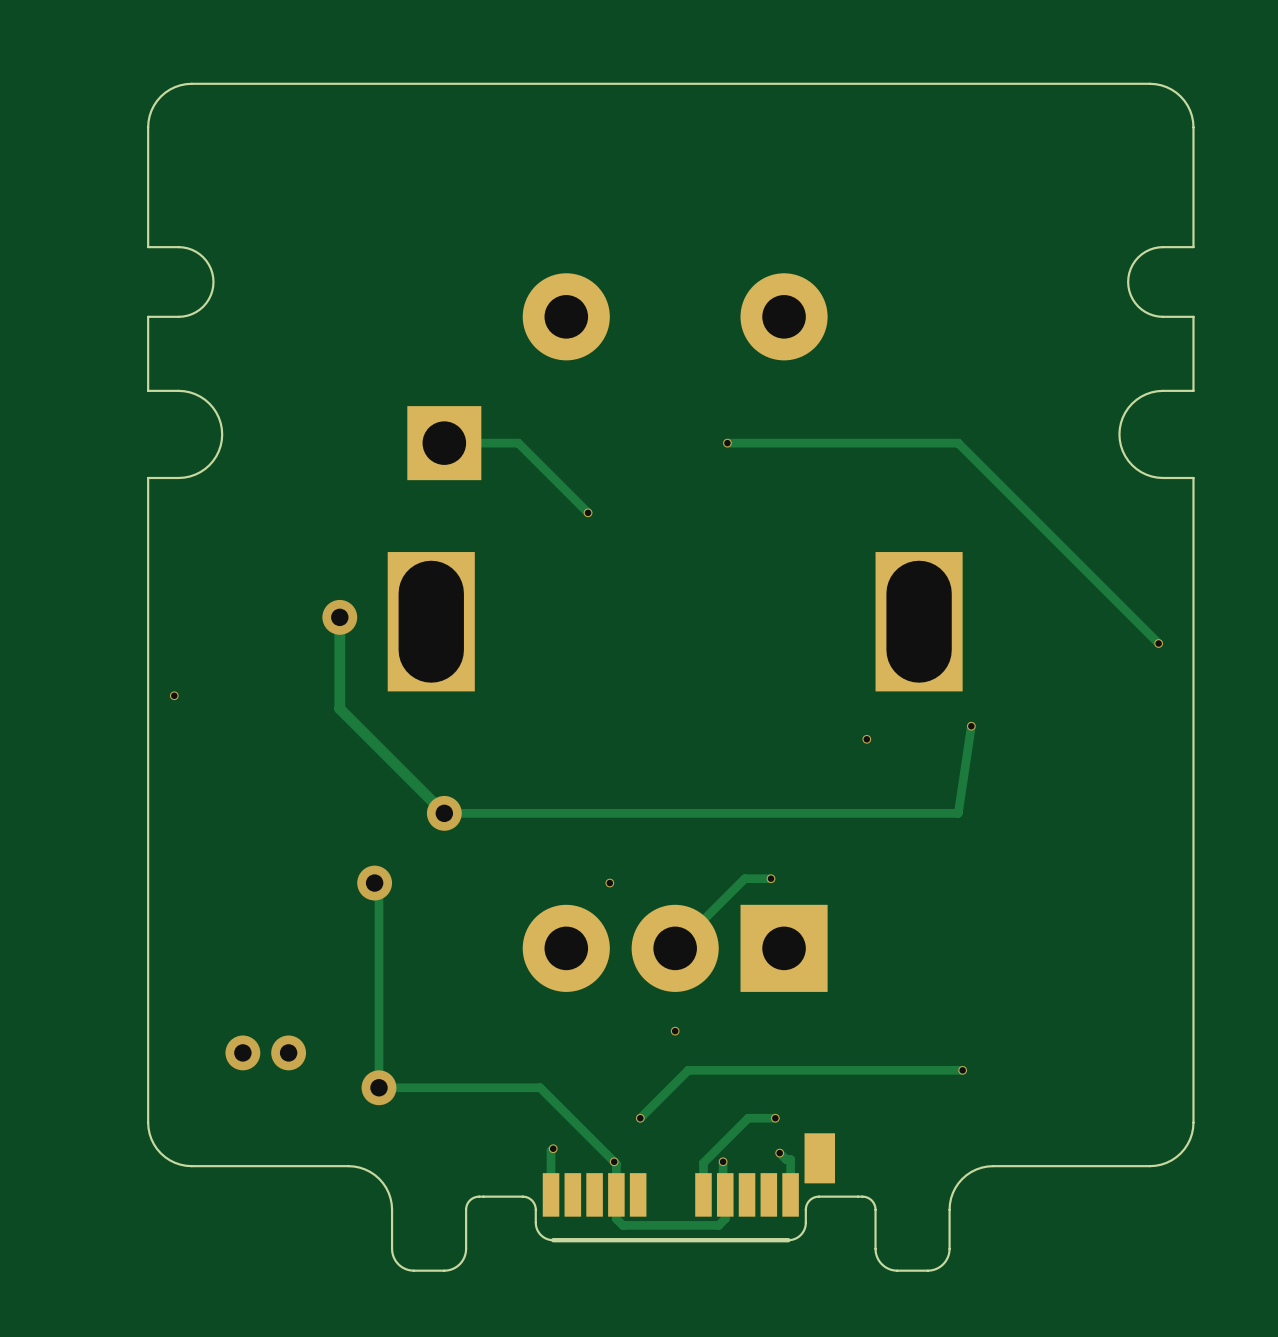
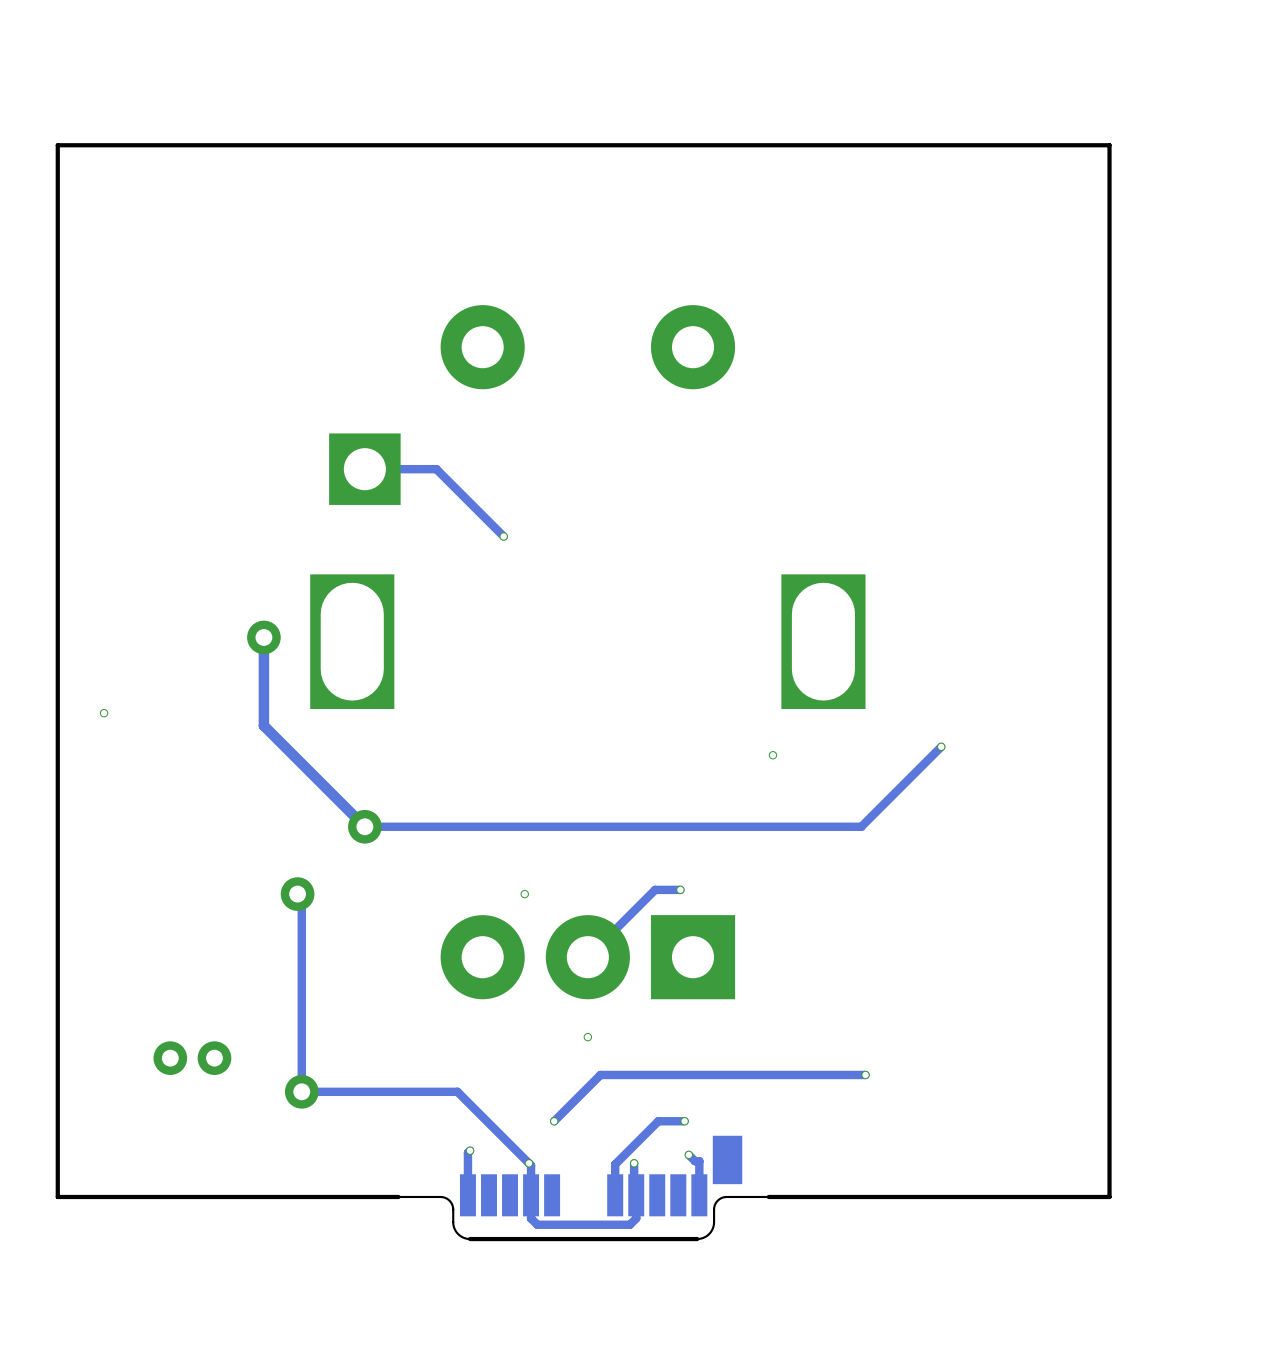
track: (727, 443) (958, 443) (1158, 643) -> none
via: (727, 443) -> none
via: (1158, 643) -> none
track: (971, 726) (958, 813) -> (941, 746) (861, 826)
via position: (971, 726) -> (941, 746)
board edge: (862, 1196) (870, 1199) (875, 1206) (875, 1251) (881, 1264) (894, 1270) (930, 1270) (941, 1266) (947, 1257) (951, 1198) (958, 1183) (971, 1171) (993, 1166) (1155, 1165) (1176, 1157) (1184, 1149) (1191, 1133) (1193, 477) (1157, 477) (1141, 472) (1125, 456) (1119, 434) (1125, 412) (1141, 396) (1157, 391) (1193, 390) (1193, 316) (1162, 316) (1149, 314) (1135, 303) (1128, 286) (1128, 277) (1132, 264) (1145, 251) (1158, 247) (1193, 247) (1191, 116) (1180, 96) (1161, 85) (191, 83) (169, 89) (153, 105) (148, 127) (148, 247) (183, 247) (196, 251) (208, 264) (213, 281) (208, 299) (196, 312) (183, 316) (148, 316) (148, 390) (184, 391) (200, 396) (216, 412) (222, 434) (216, 456) (200, 472) (184, 477) (148, 477) (149, 1133) (157, 1149) (165, 1157) (186, 1165) (348, 1166) (370, 1171) (383, 1183) (390, 1198) (393, 1257) (400, 1266) (410, 1270) (447, 1270) (459, 1264) (465, 1251) (466, 1206) (471, 1199) (479, 1196) -> (768, 1196) (1109, 1196) (1109, 145) (57, 145) (57, 1196) (398, 1196)

